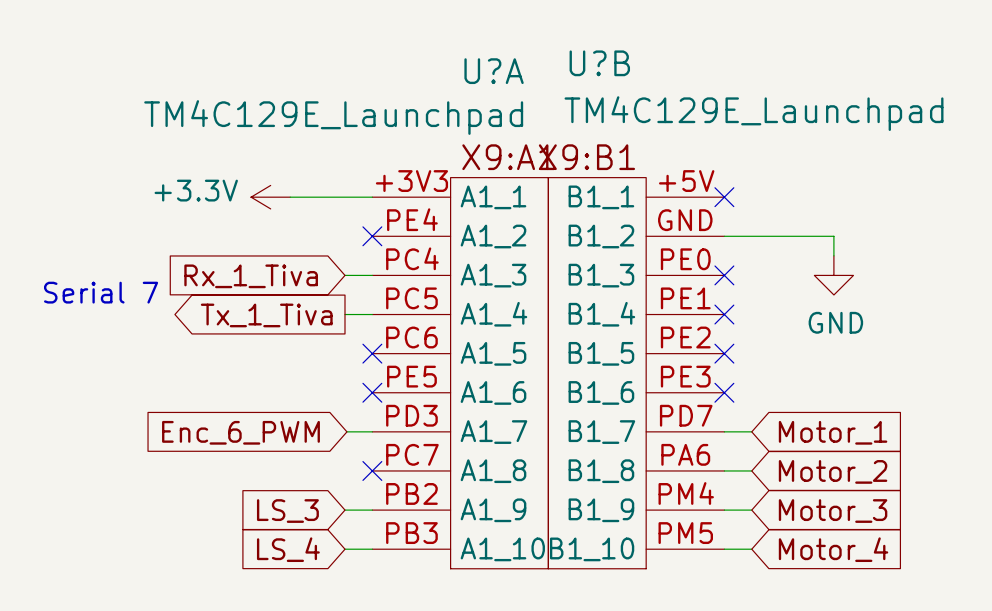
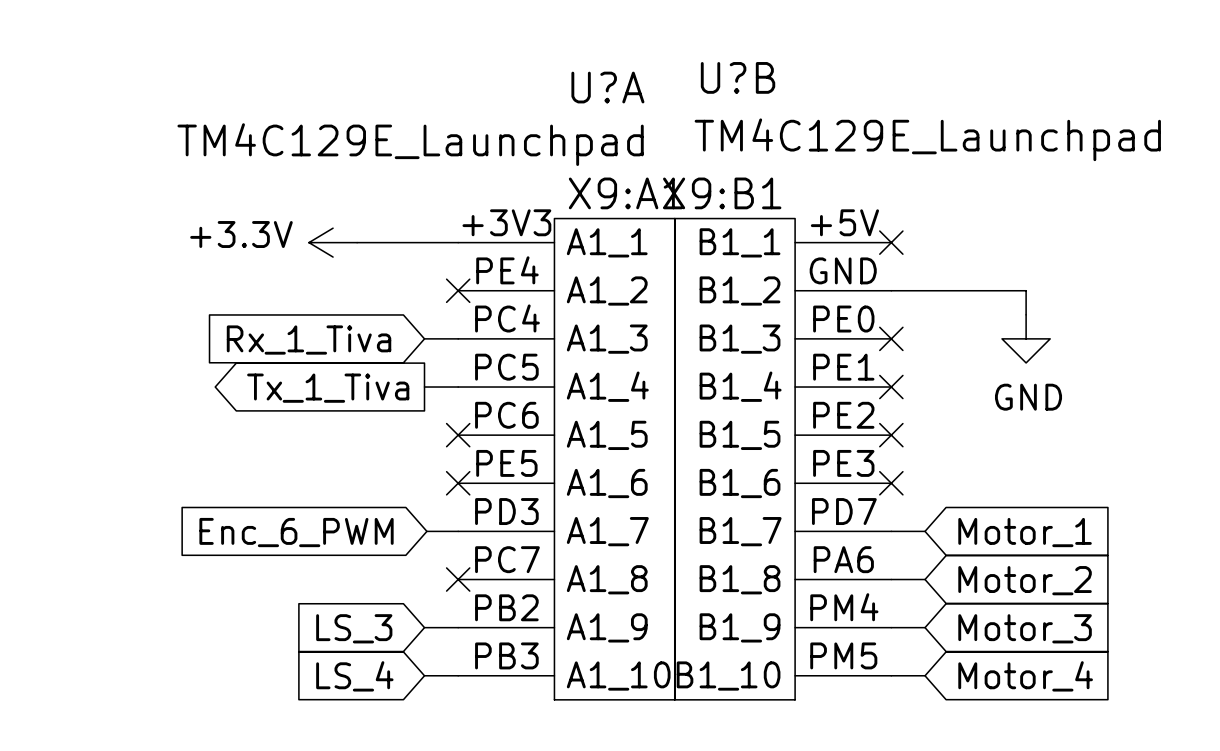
text: Serial 7 (101, 292) -> none

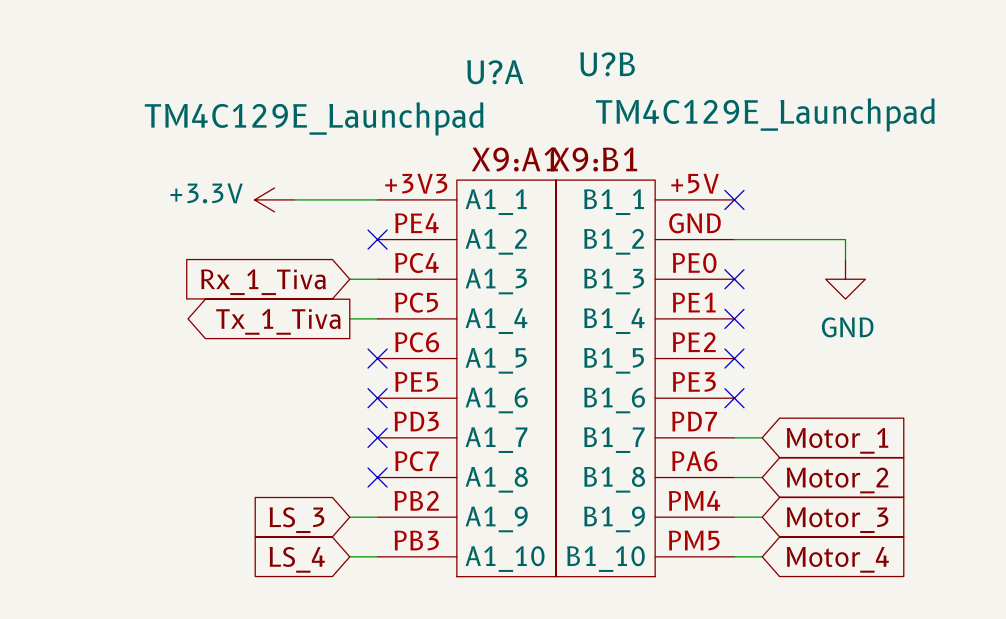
wire: (426, 531) (458, 531) -> none
no-connect mark: none -> (377, 437)
global label: Enc_6_PWM (296, 532) -> none

